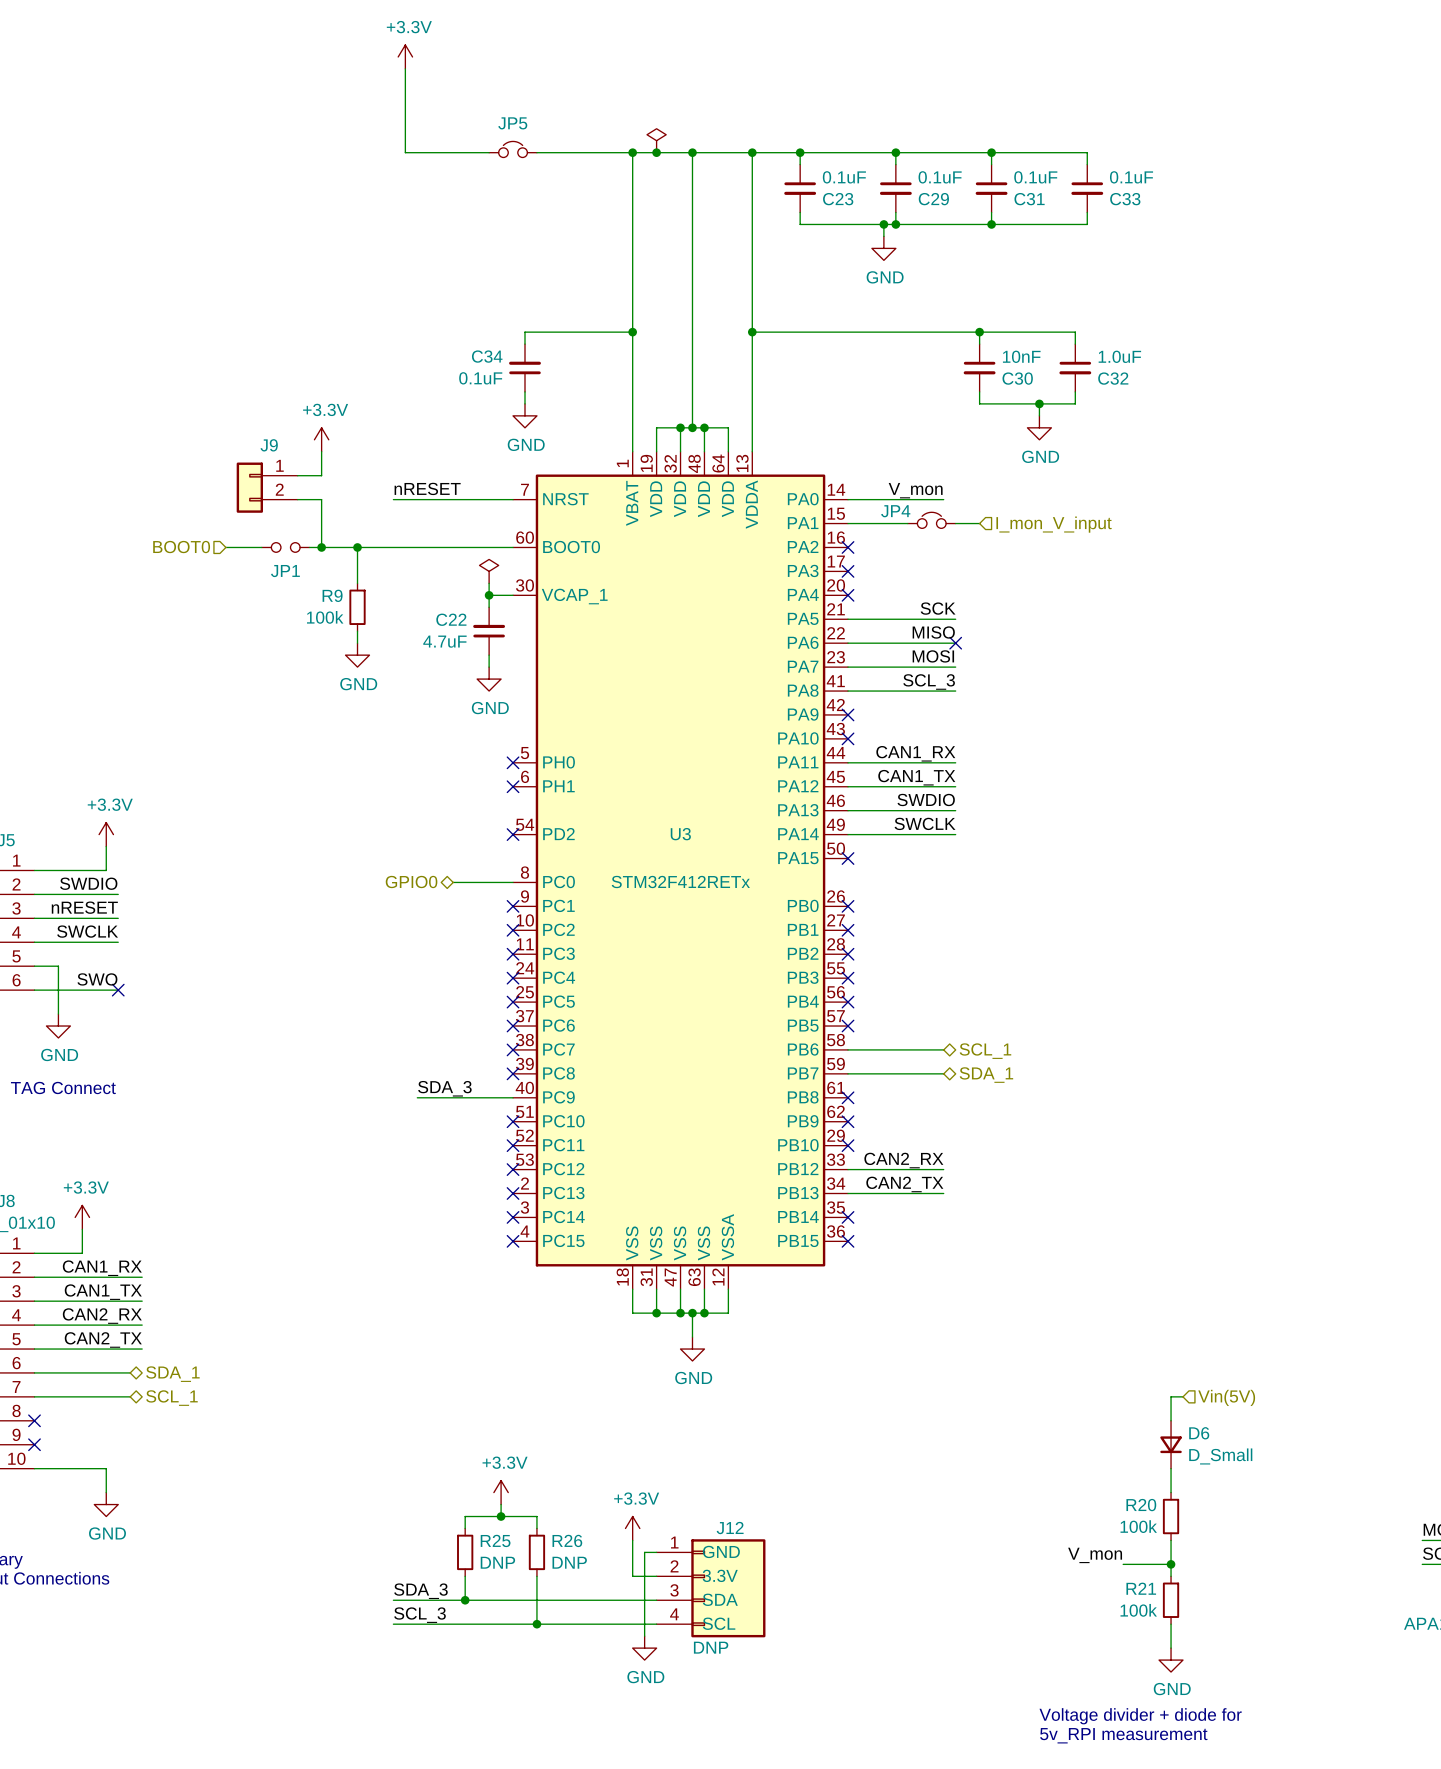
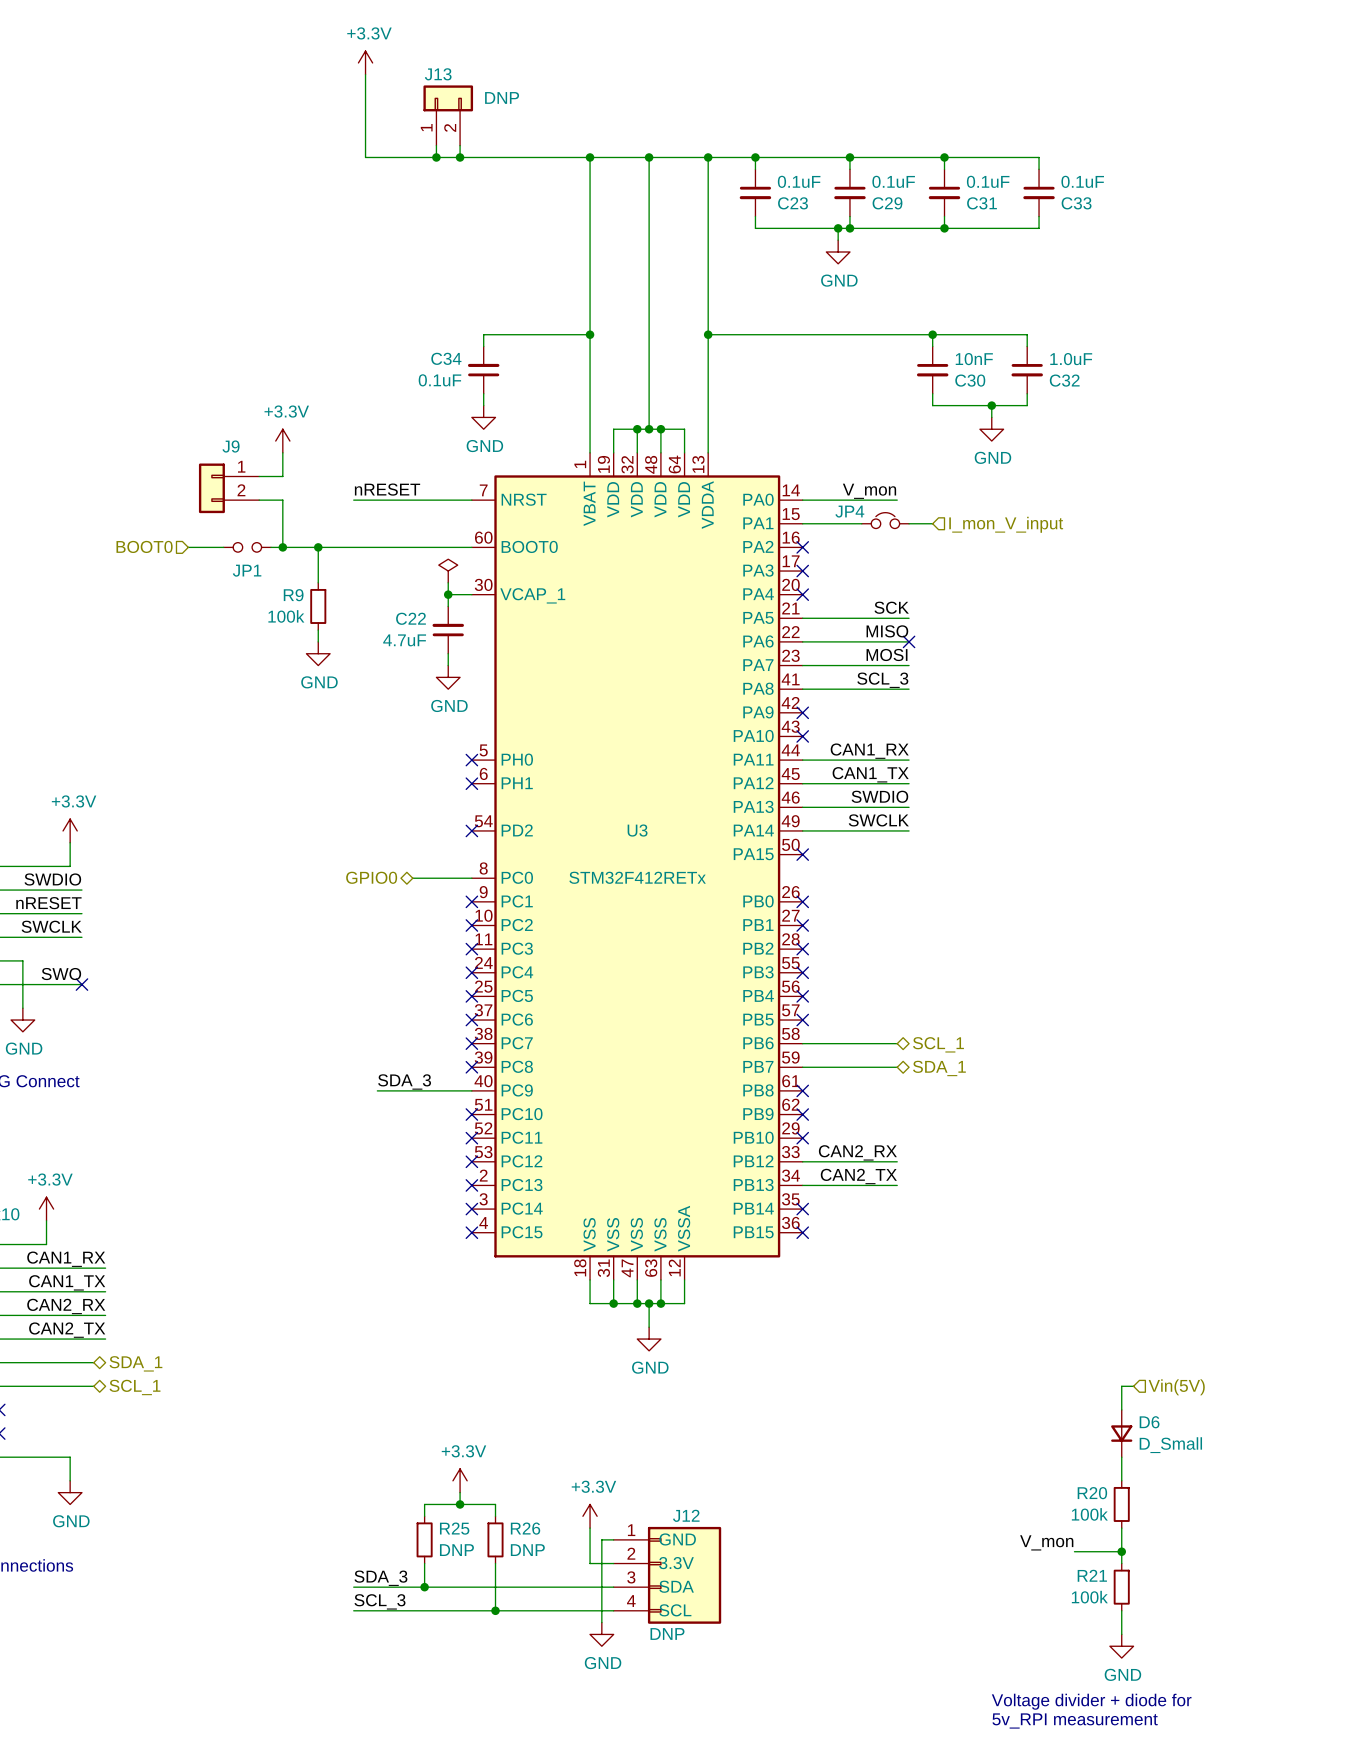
J13: none -> DNP (448, 115)
wire: none -> (436, 145) (436, 157)
wire: none -> (460, 145) (460, 157)
power symbol: (656, 140) -> none
JP5: (513, 149) -> none
junction: none -> (436, 157)
wire: none -> (448, 157) (495, 157)
junction: none -> (460, 157)
junction: (656, 152) -> none

